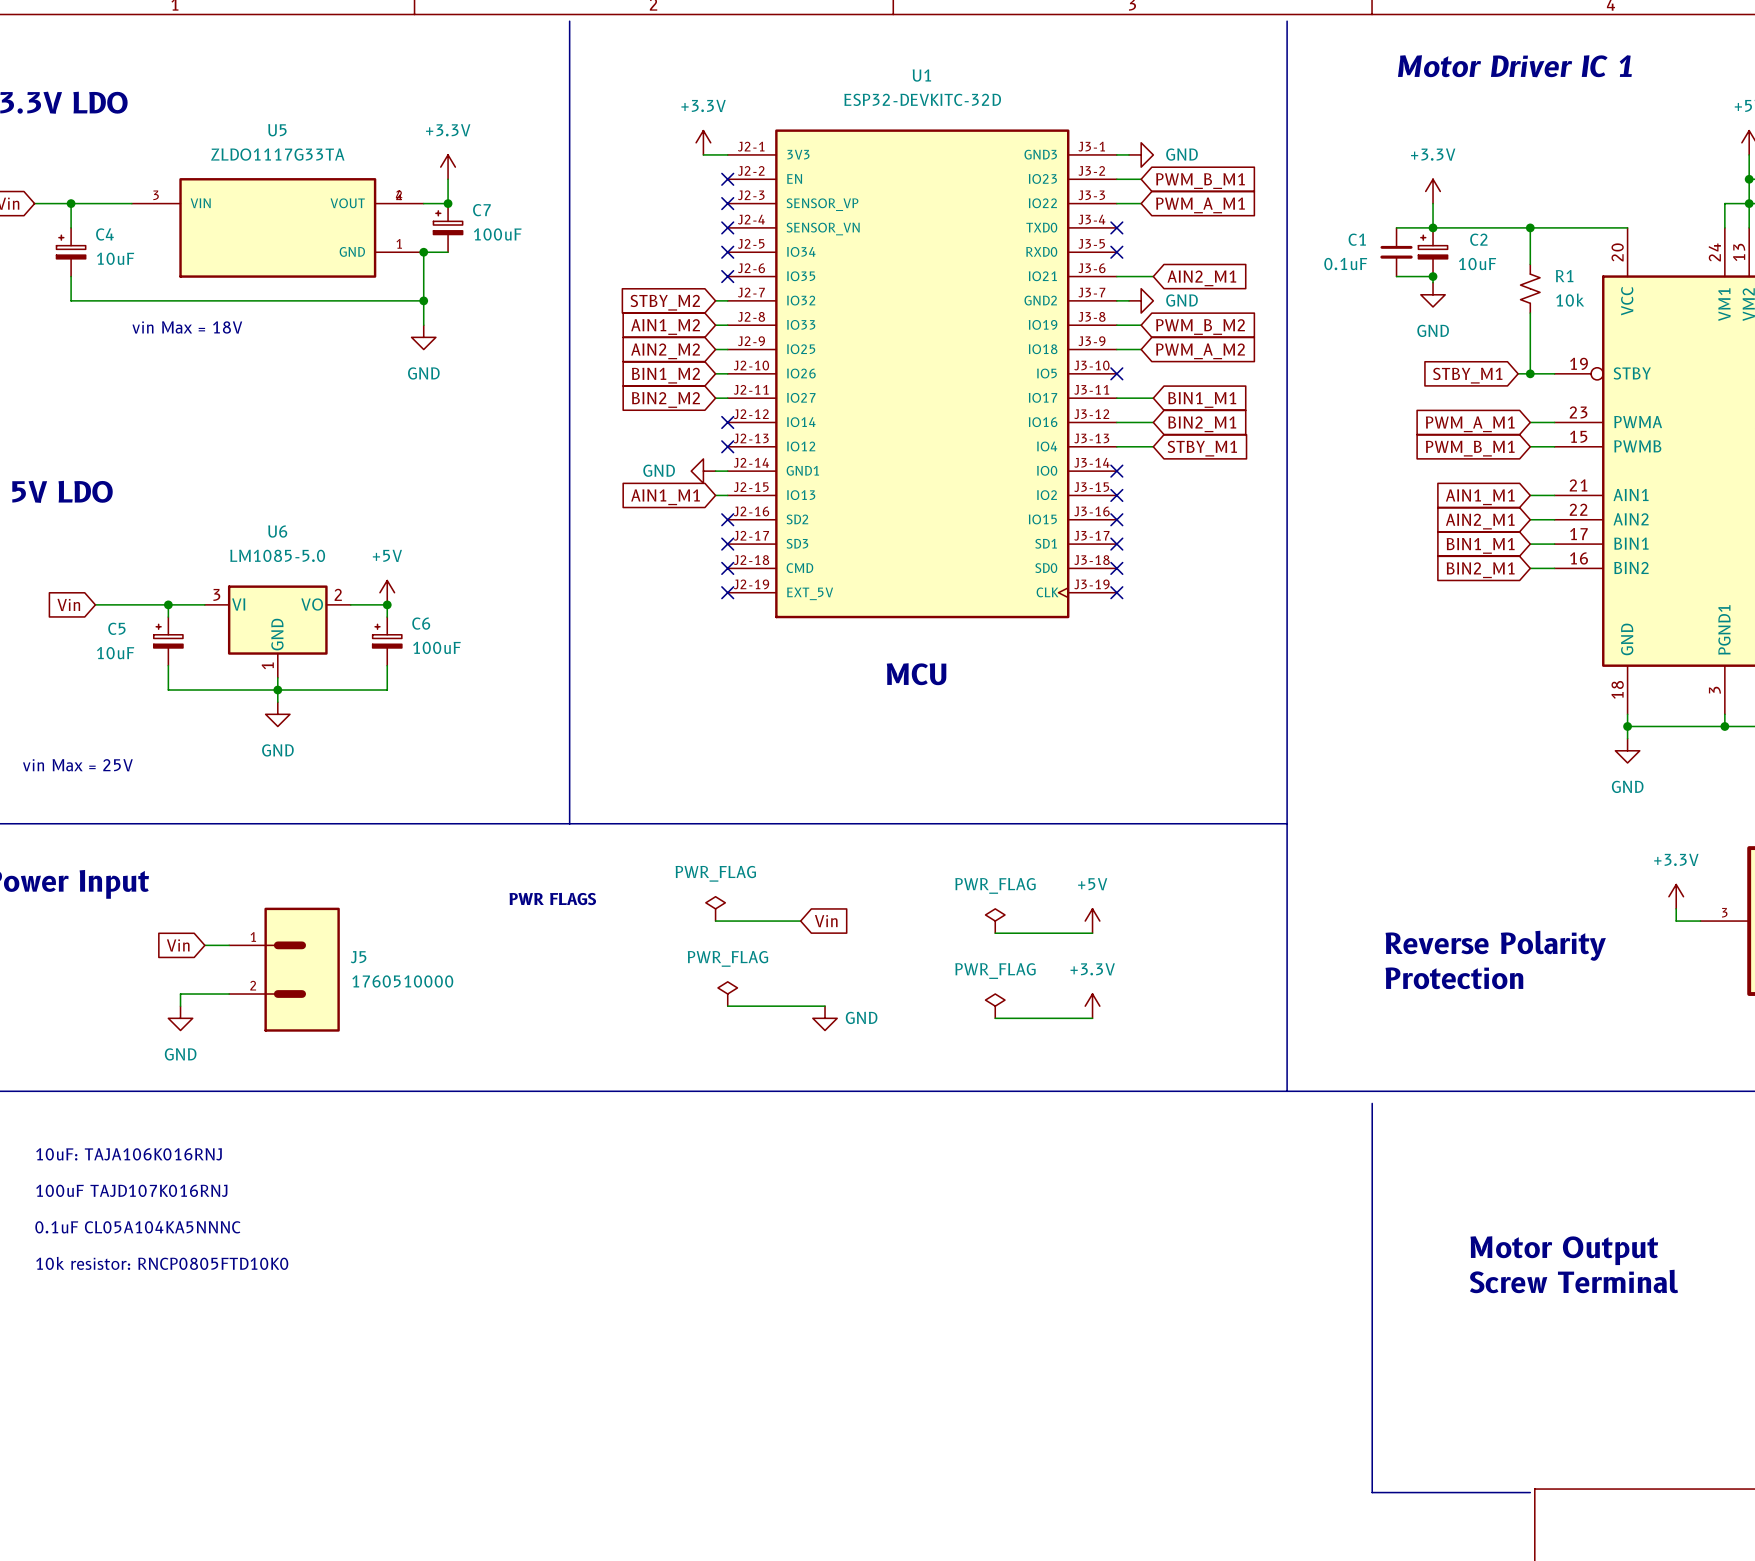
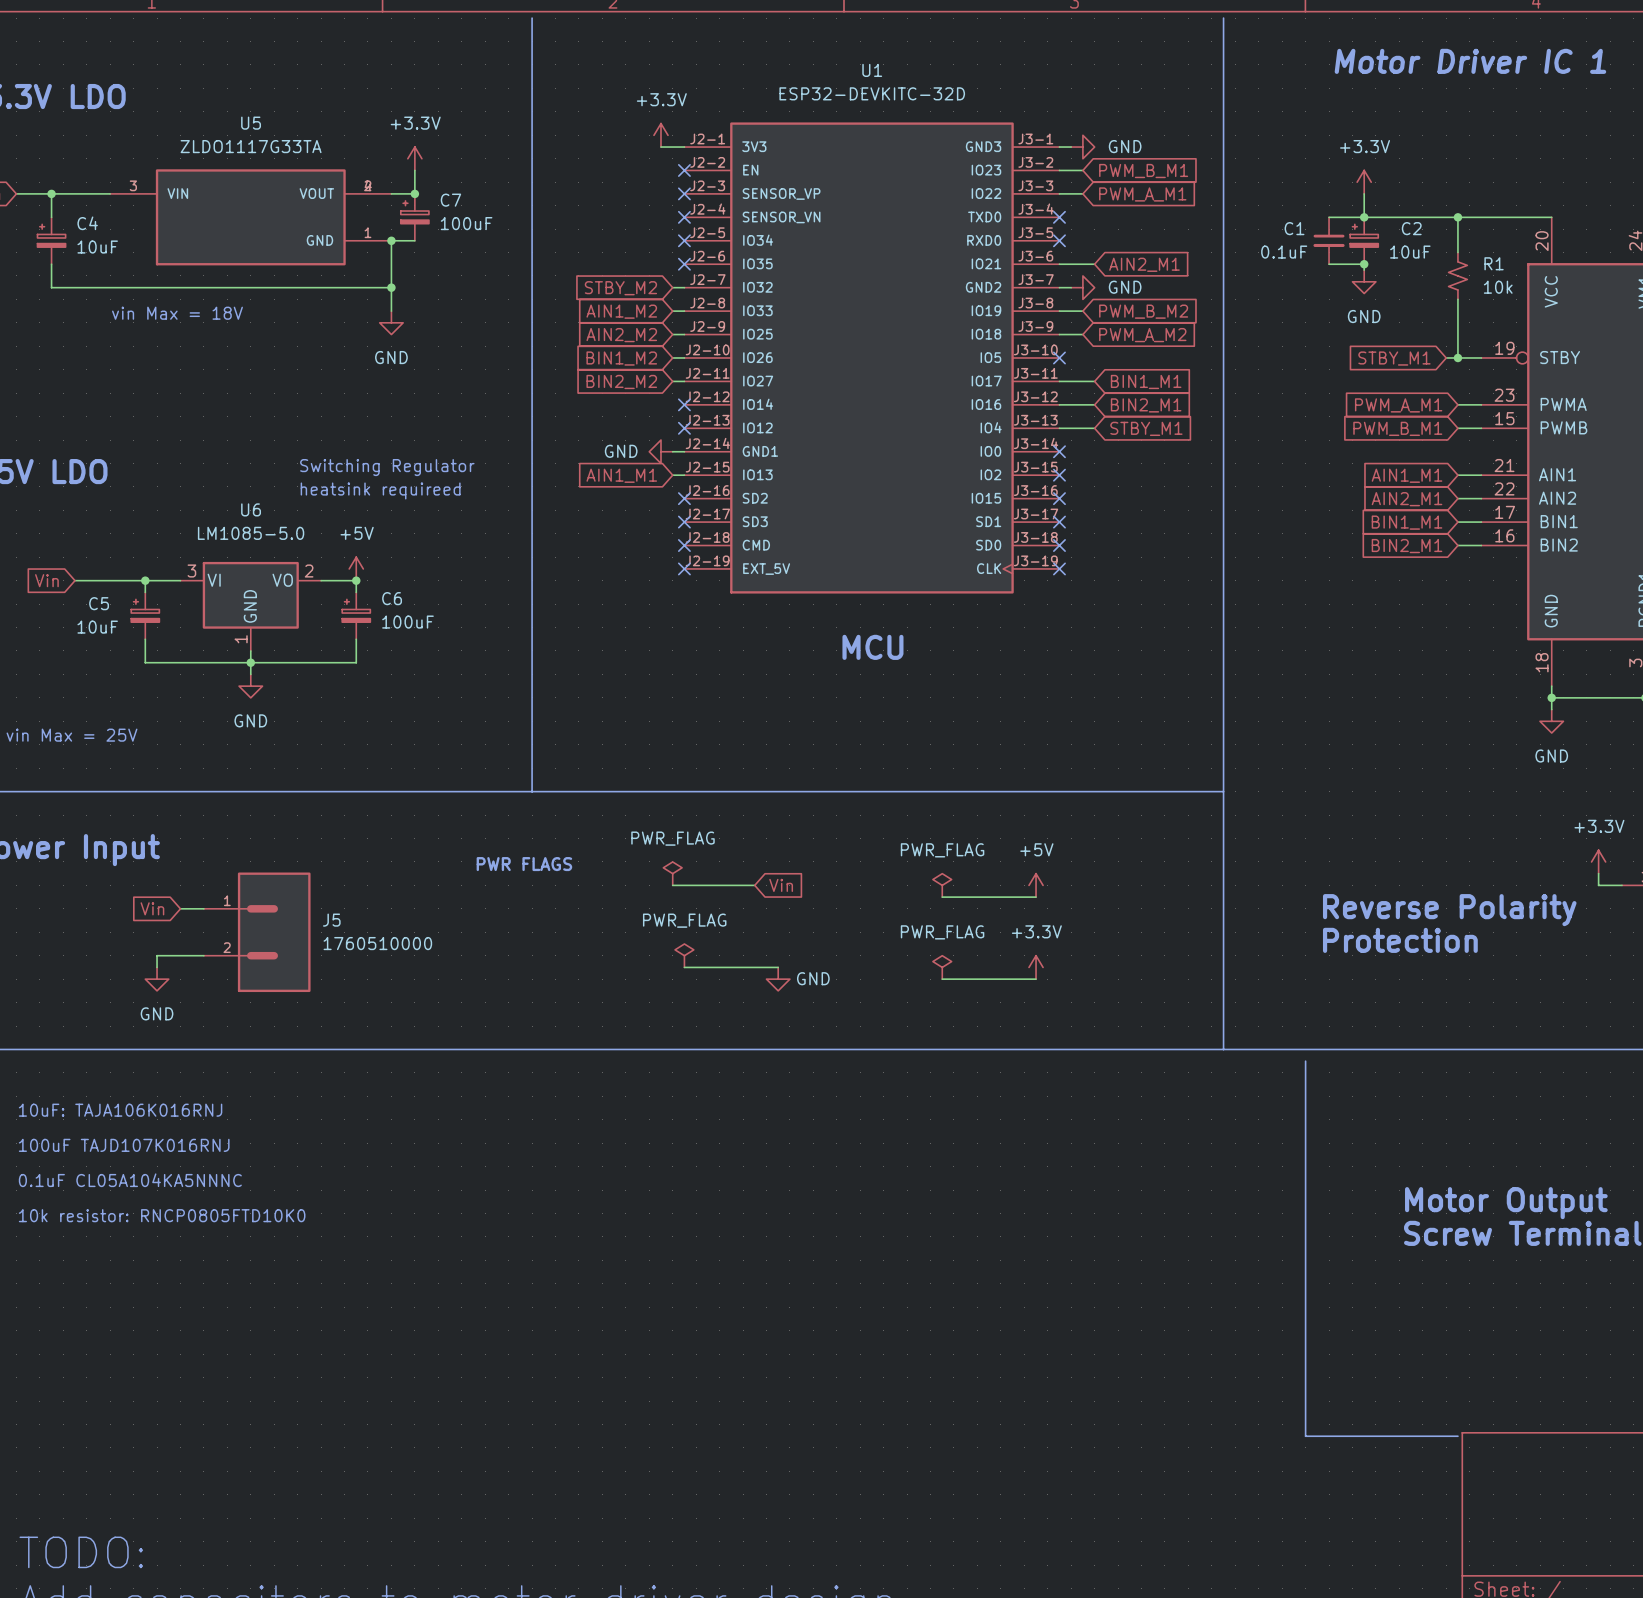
text: none -> Switching Regulator (387, 467)
text: none -> heatsink requireed (380, 490)

